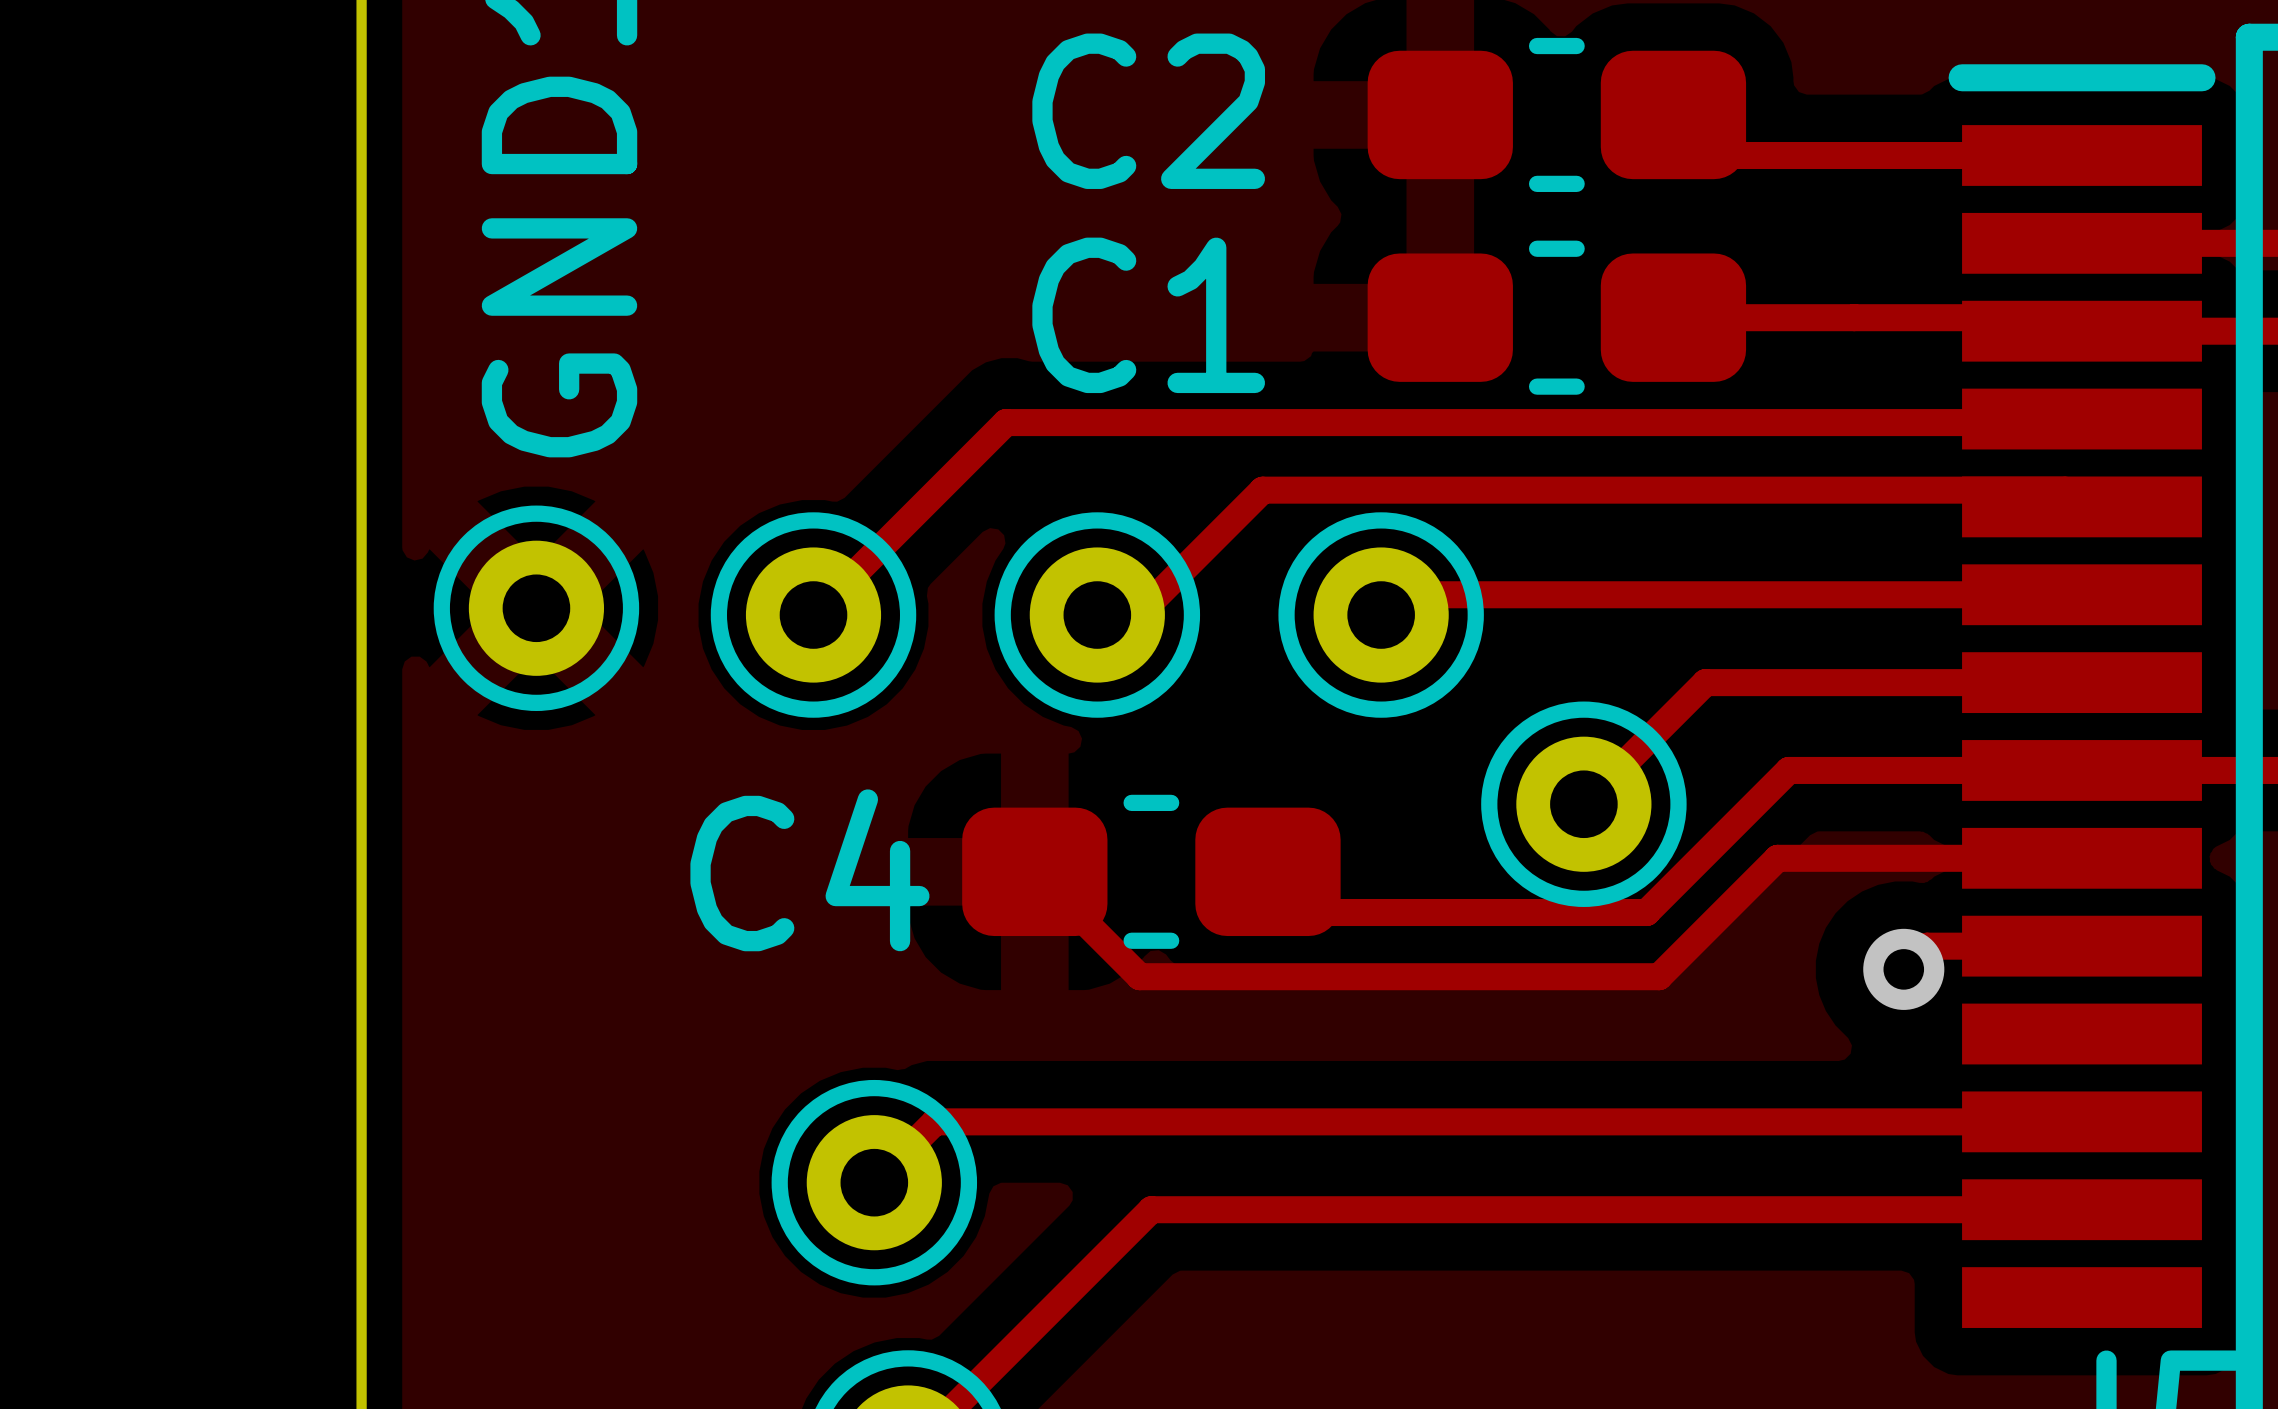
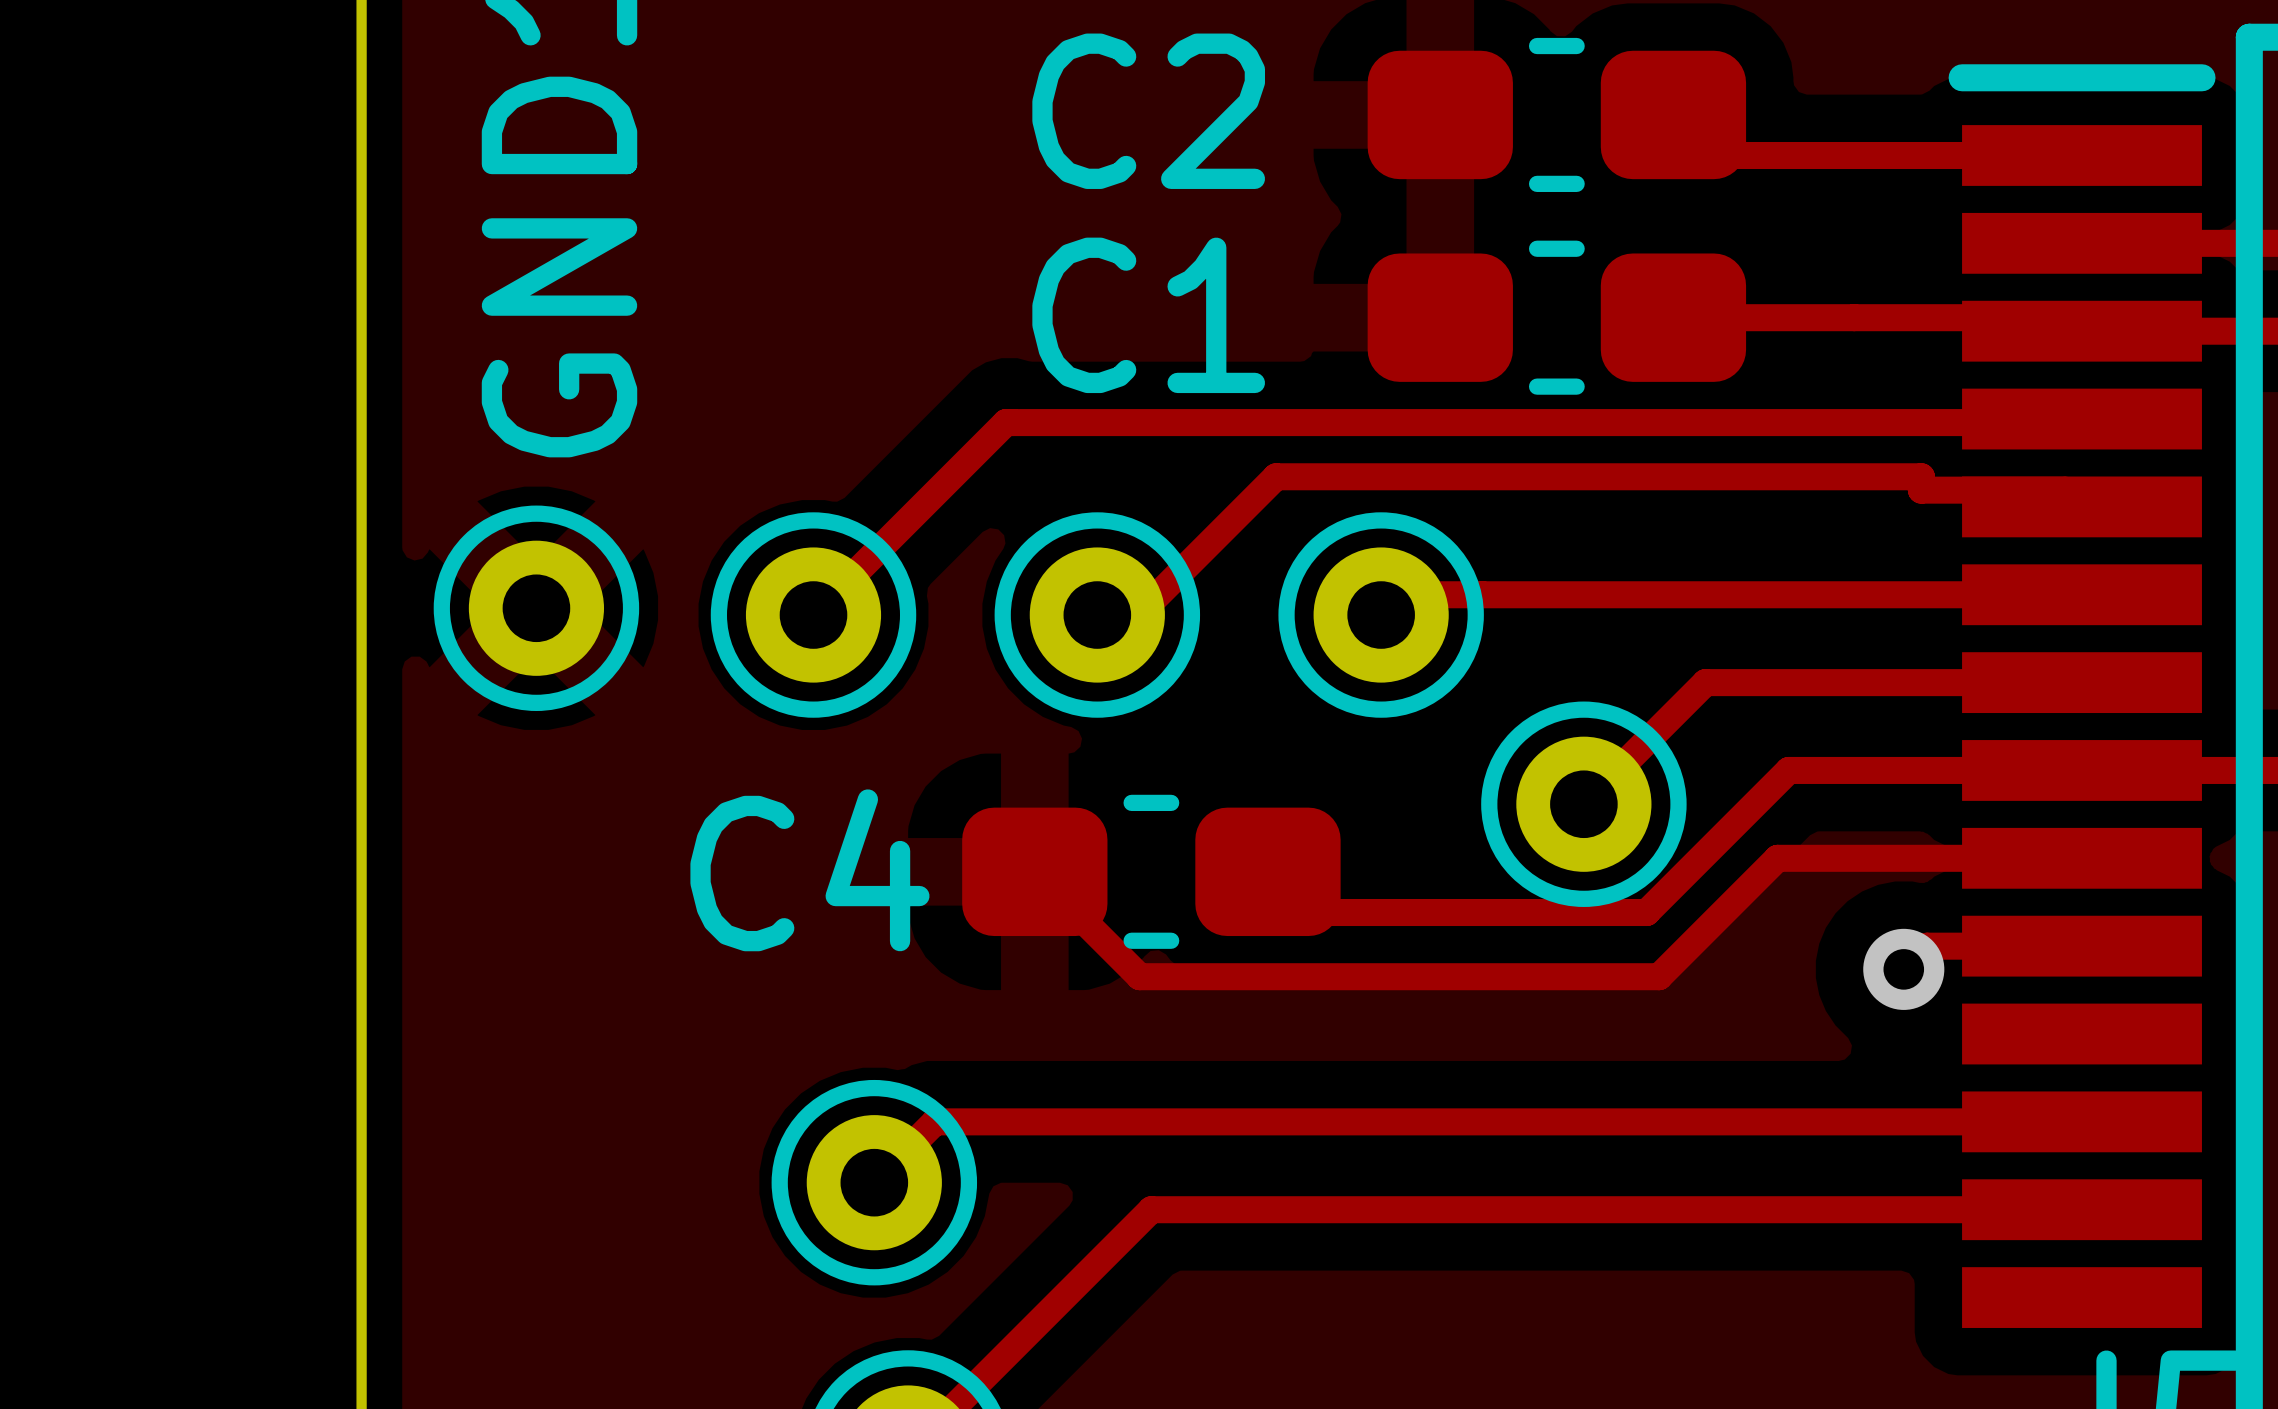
track: (1262, 490) (1921, 490) -> (1262, 490) (1276, 476) (1921, 476) (1921, 490)

